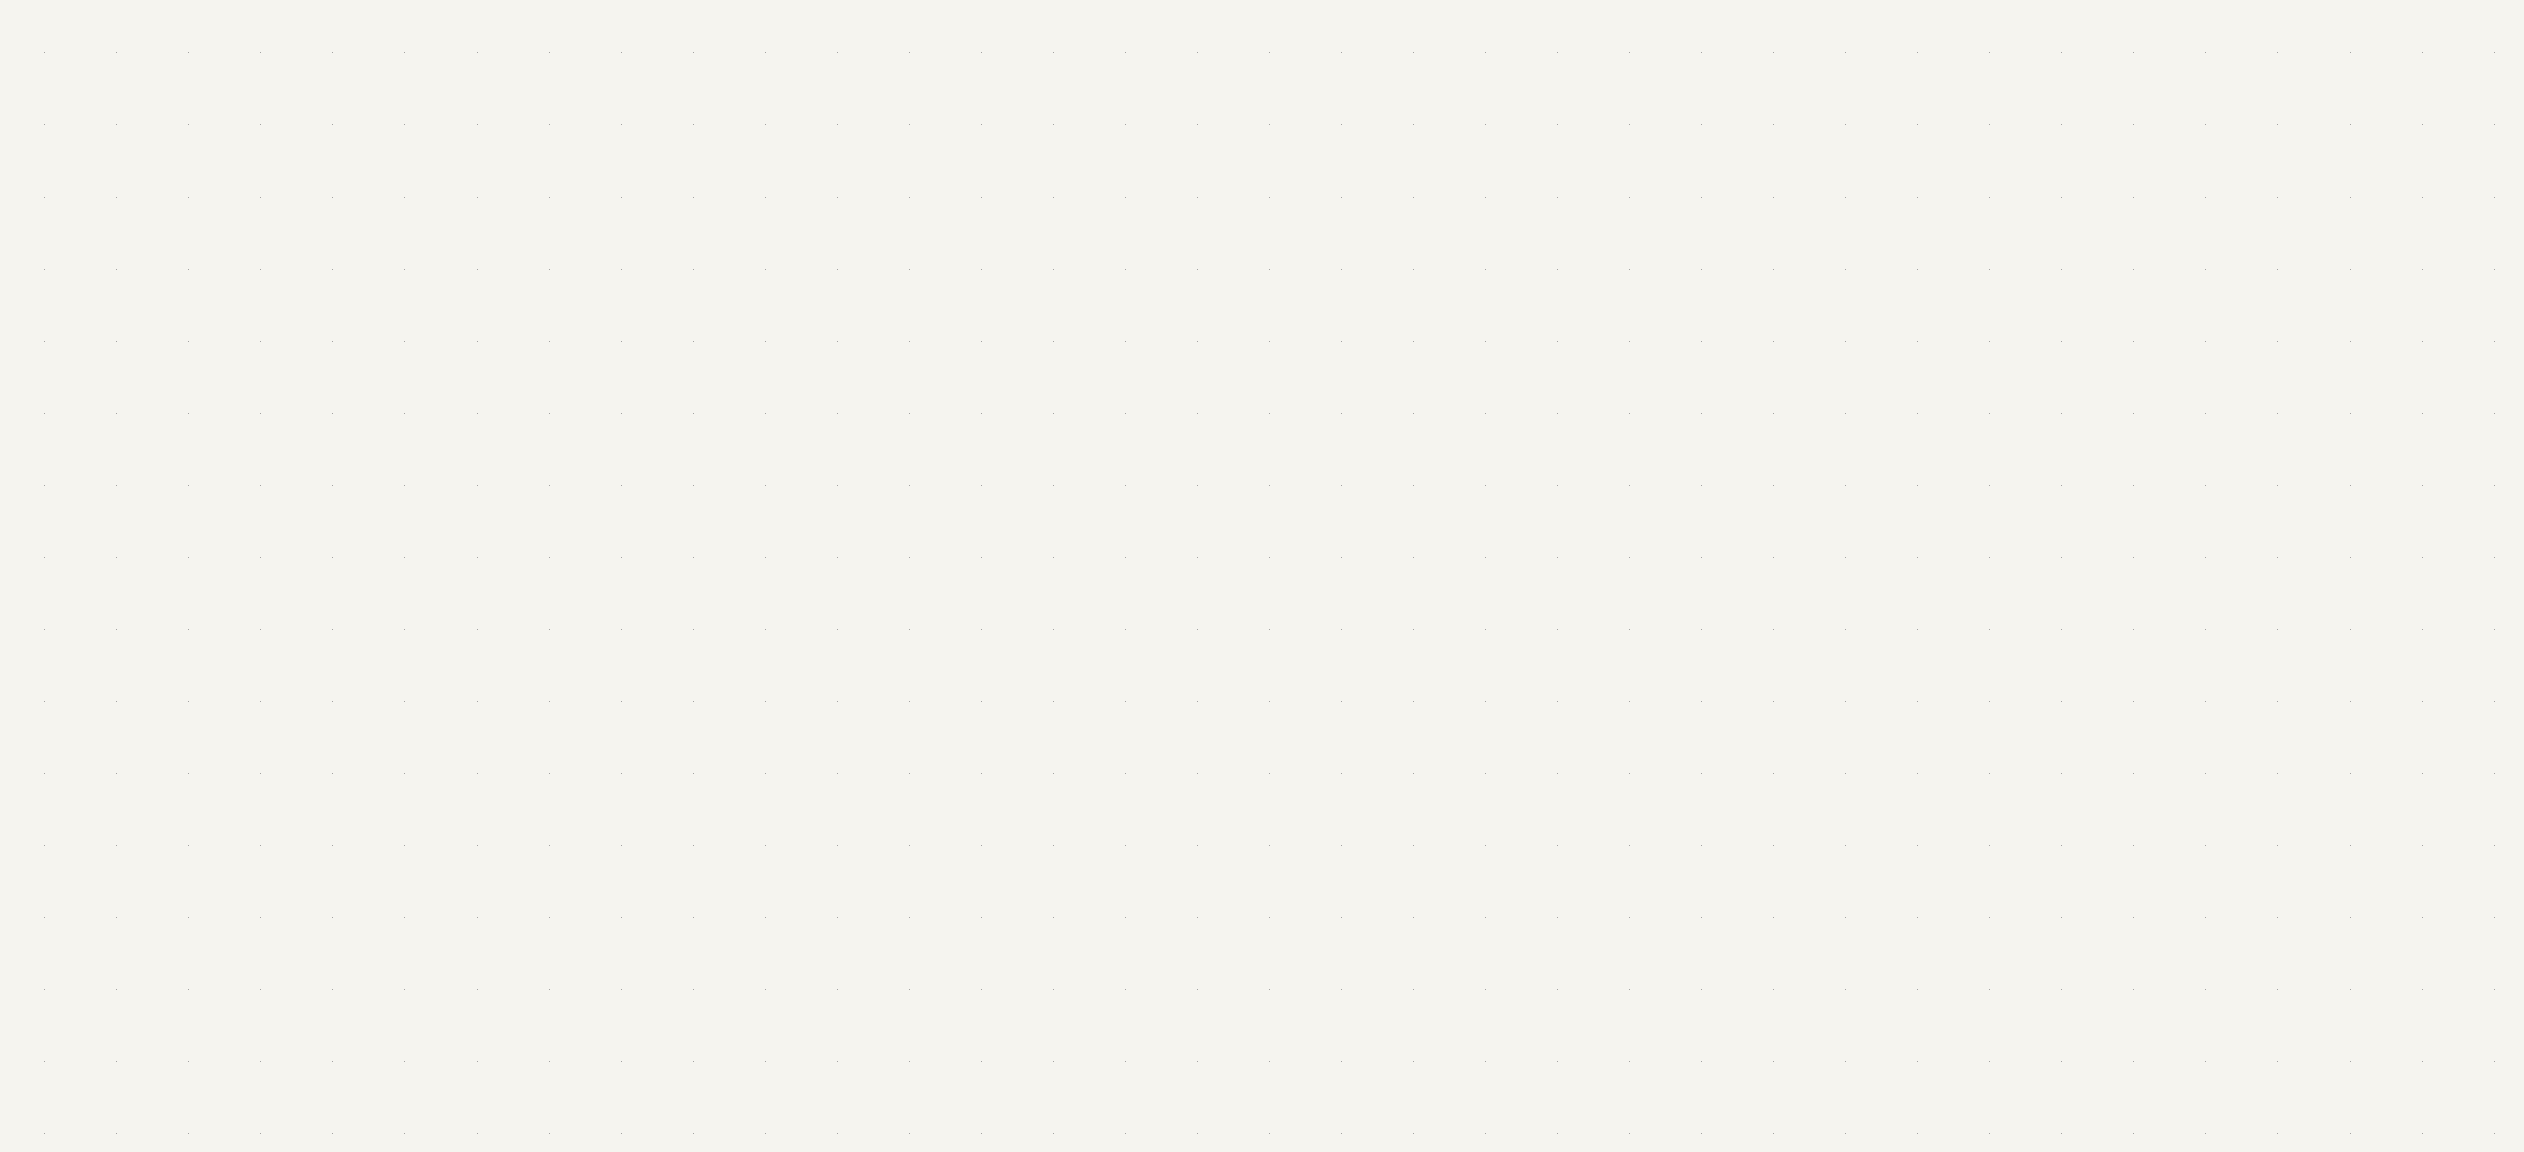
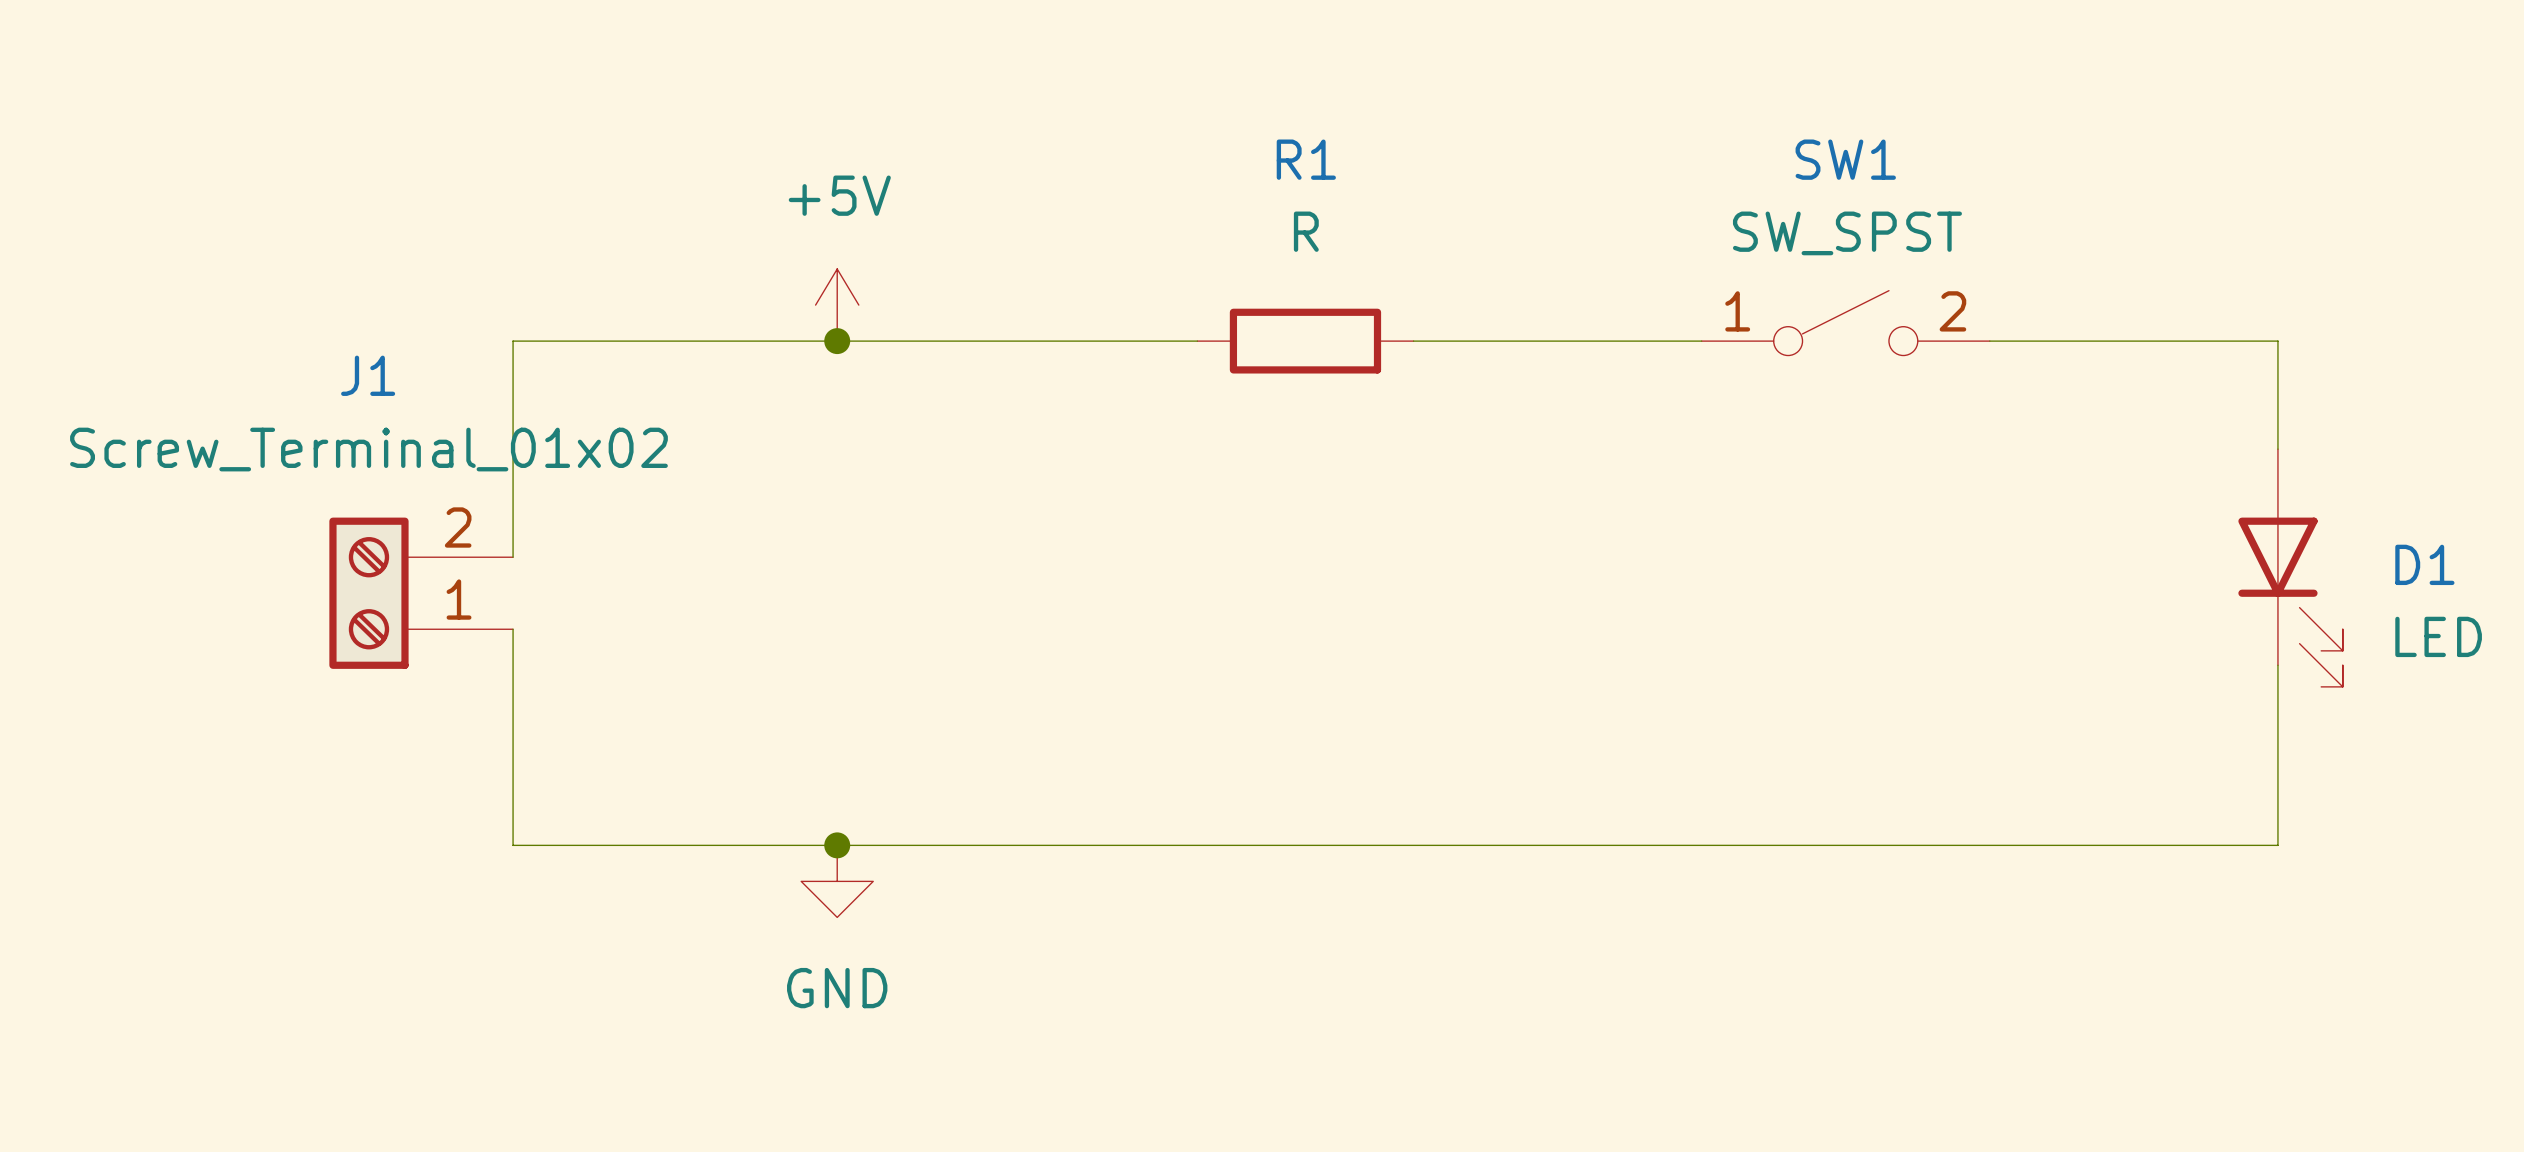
power symbol: none -> +5V (837, 305)
SW1: none -> SW_SPST (1845, 323)
junction: none -> (837, 341)
wire: none -> (1197, 341) (513, 341) (513, 557)
R1: none -> R (1305, 341)
wire: none -> (1413, 341) (1701, 341)
wire: none -> (1989, 341) (2277, 341) (2277, 449)
D1: none -> LED (2290, 568)
J1: none -> Screw_Terminal_01x02 (421, 593)
wire: none -> (513, 629) (513, 845) (2277, 845) (2277, 665)
junction: none -> (837, 845)
power symbol: none -> GND (837, 881)

